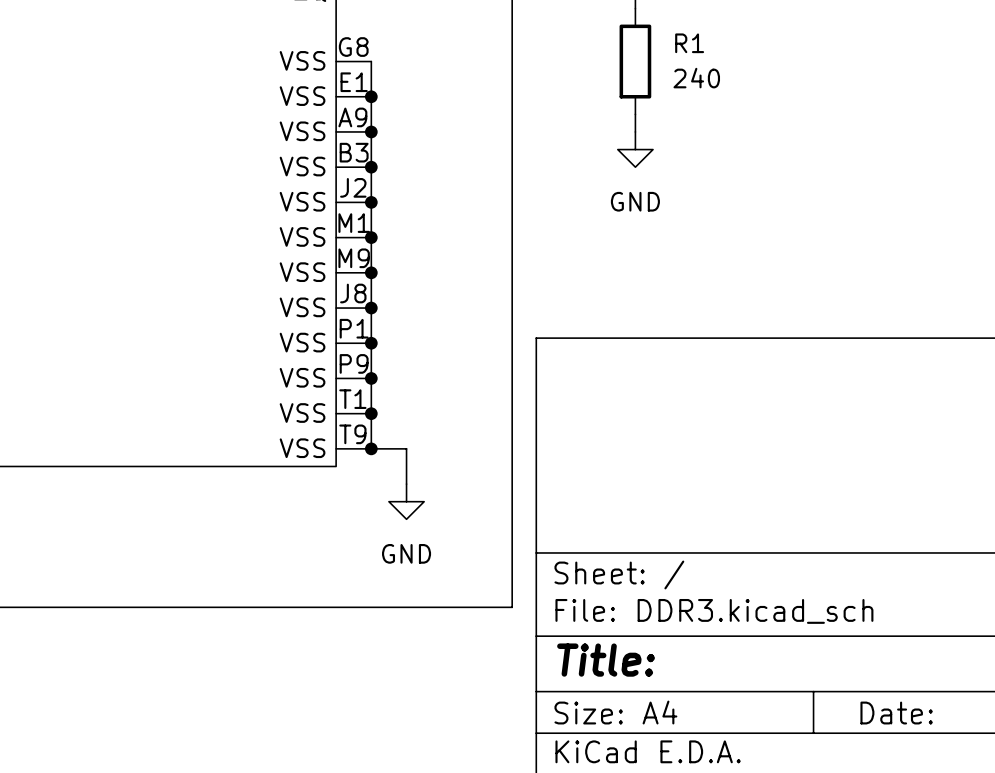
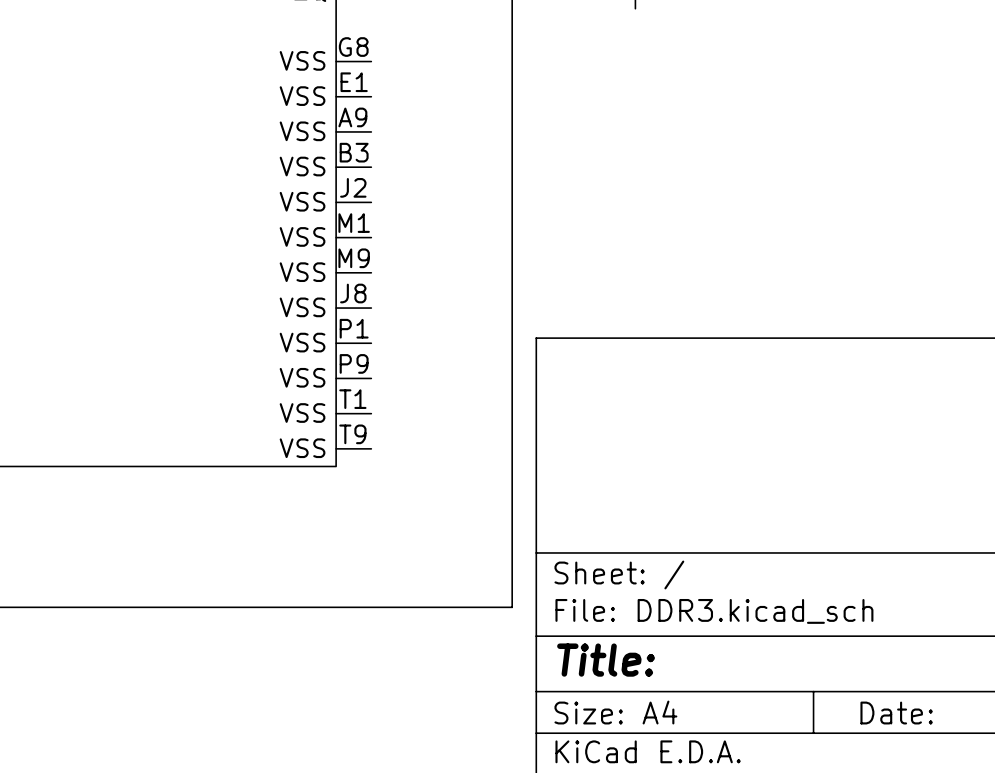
wire: (371, 61) (371, 448) (406, 448) (406, 484) -> none
R1: 240 (635, 61) -> none
junction: (371, 96) -> none
wire: (635, 114) (635, 131) -> none
junction: (371, 131) -> none
power symbol: GND (635, 149) -> none
junction: (371, 167) -> none
junction: (371, 202) -> none
junction: (371, 237) -> none
junction: (371, 272) -> none
junction: (371, 308) -> none
junction: (371, 343) -> none
junction: (371, 378) -> none
junction: (371, 413) -> none
junction: (371, 448) -> none
power symbol: GND (406, 501) -> none

